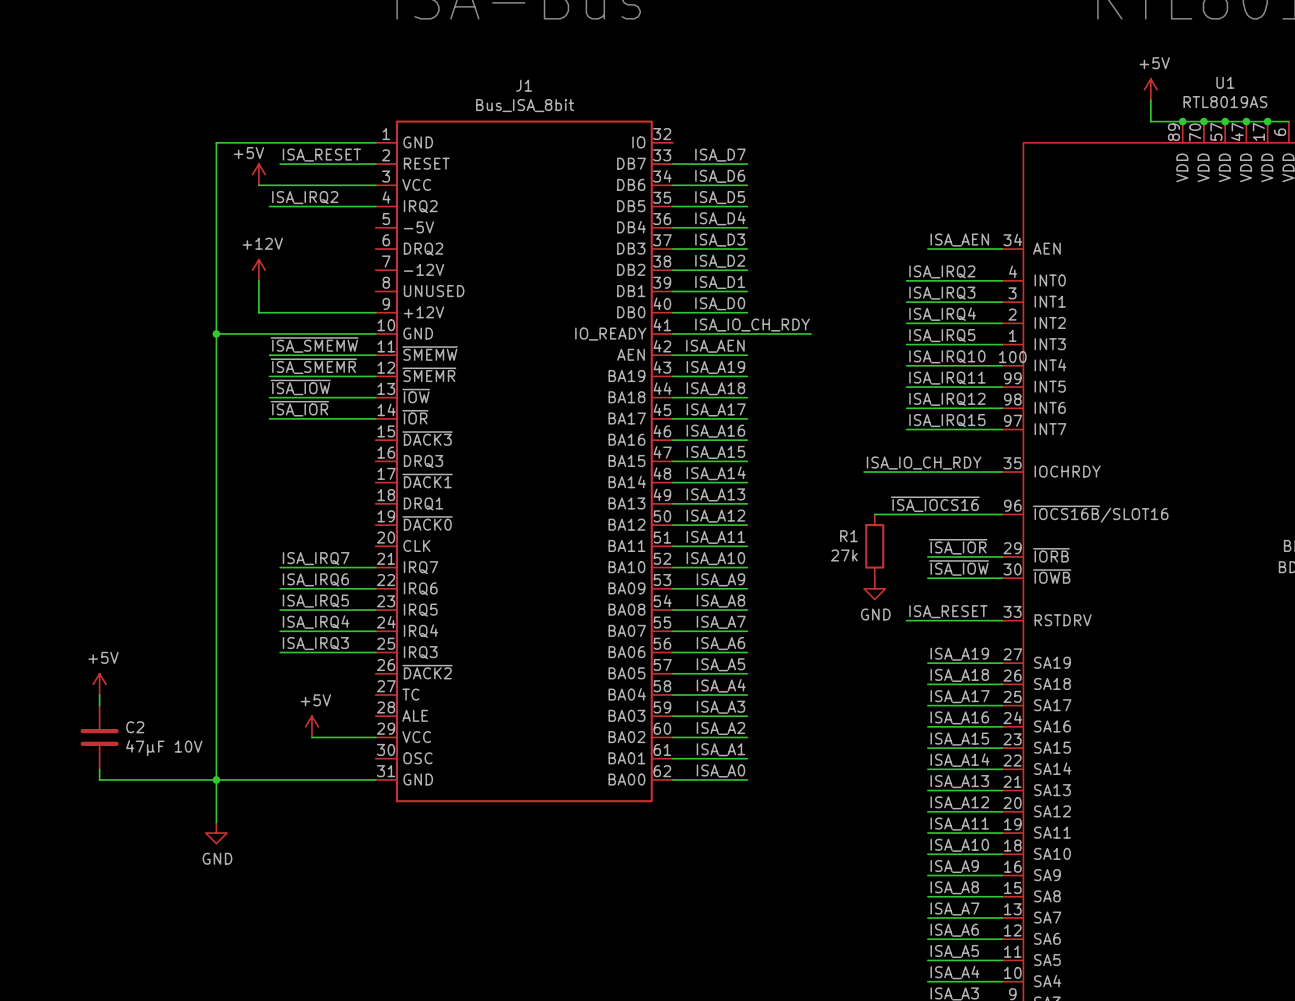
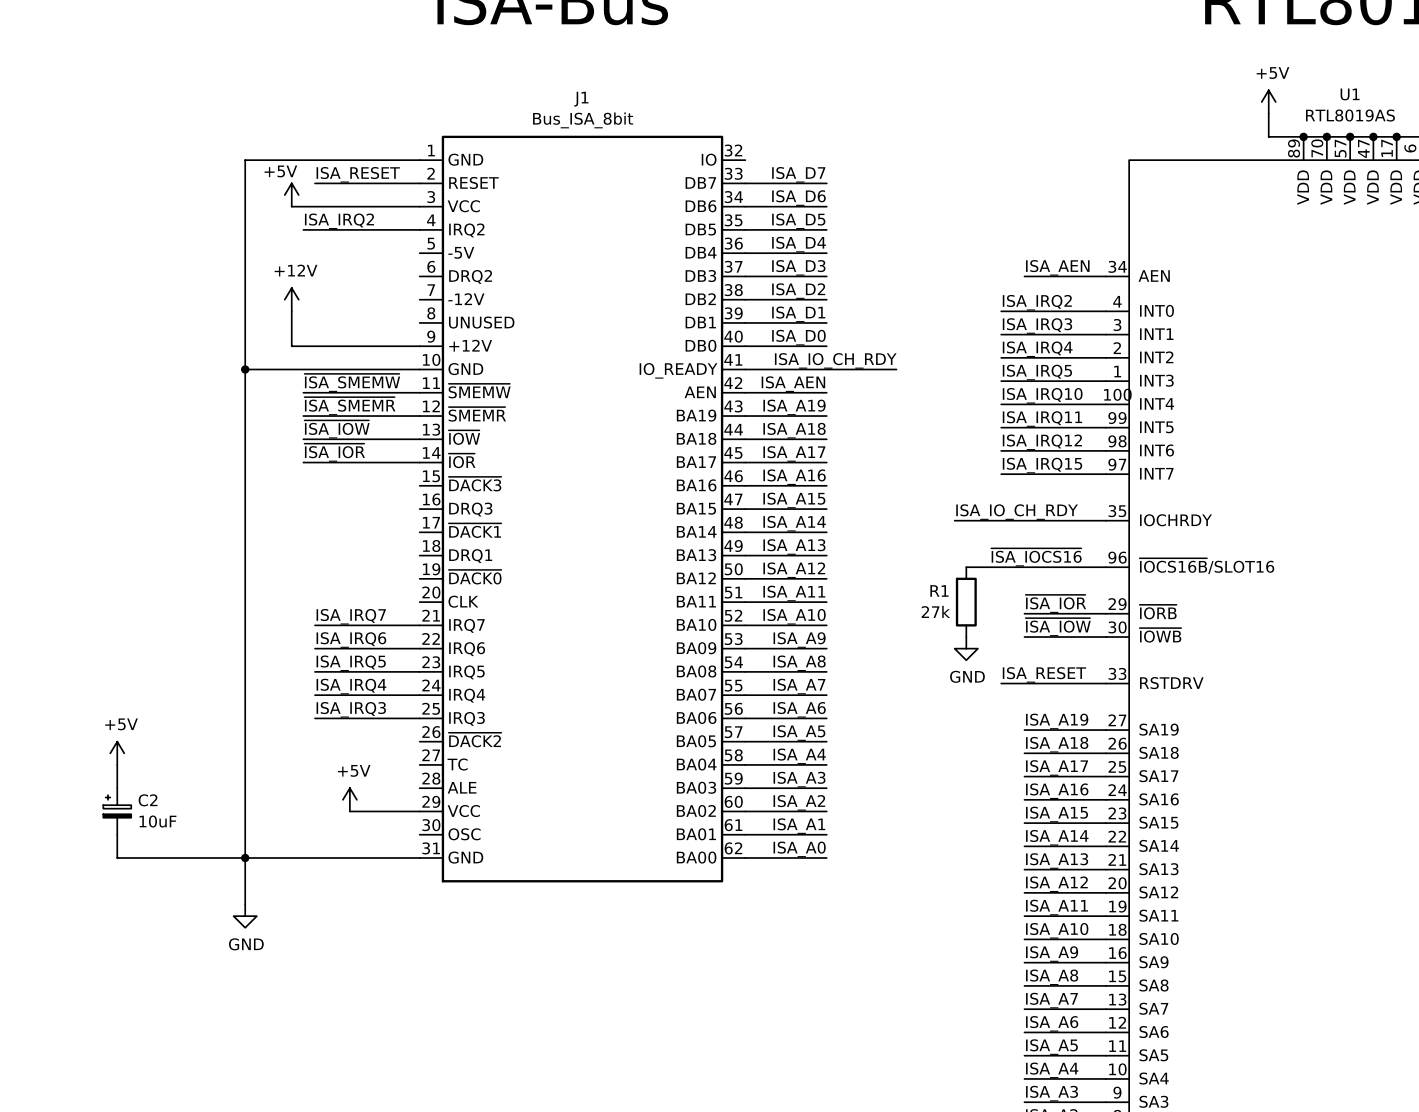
C2 symbol: [80, 705, 119, 770] -> [103, 788, 132, 835]
C2 value: 47µF 10V (164, 748) -> 10uF (157, 821)

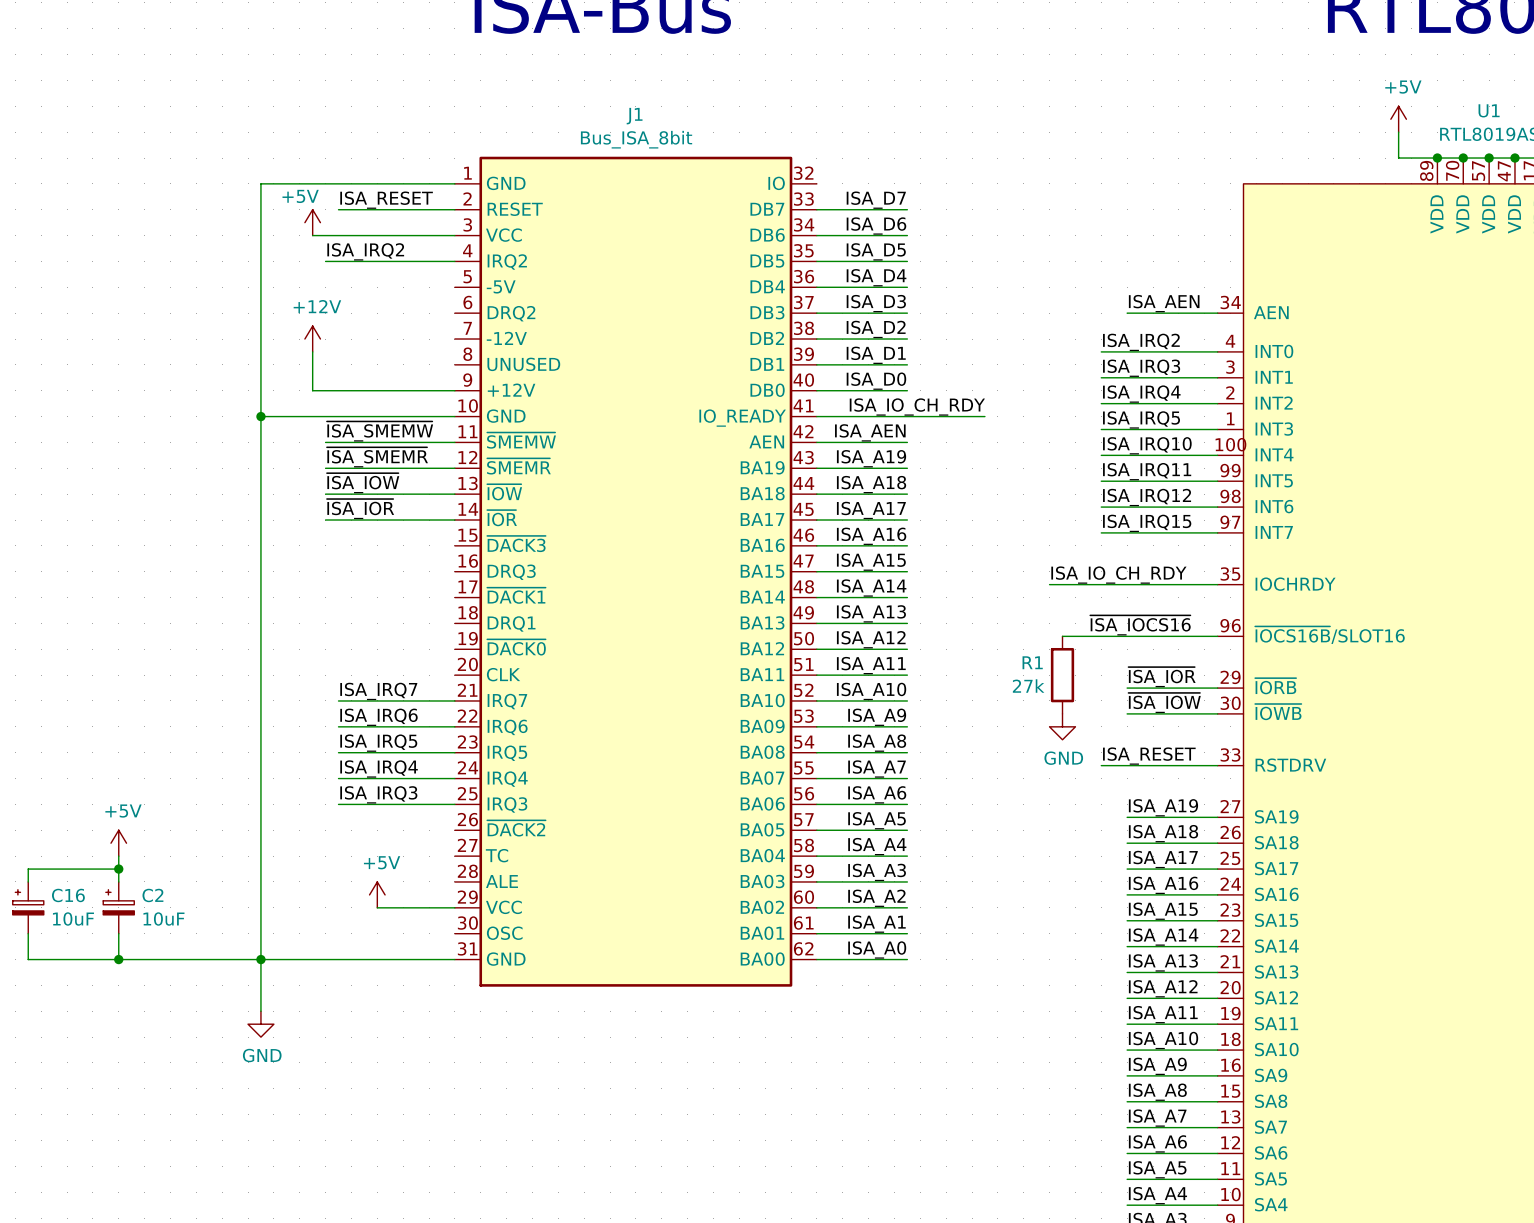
wire: none -> (118, 869) (28, 869) (28, 881)
junction: none -> (118, 869)
C16: none -> 10uF (28, 907)
wire: none -> (28, 933) (28, 959) (118, 959)
junction: none -> (118, 959)

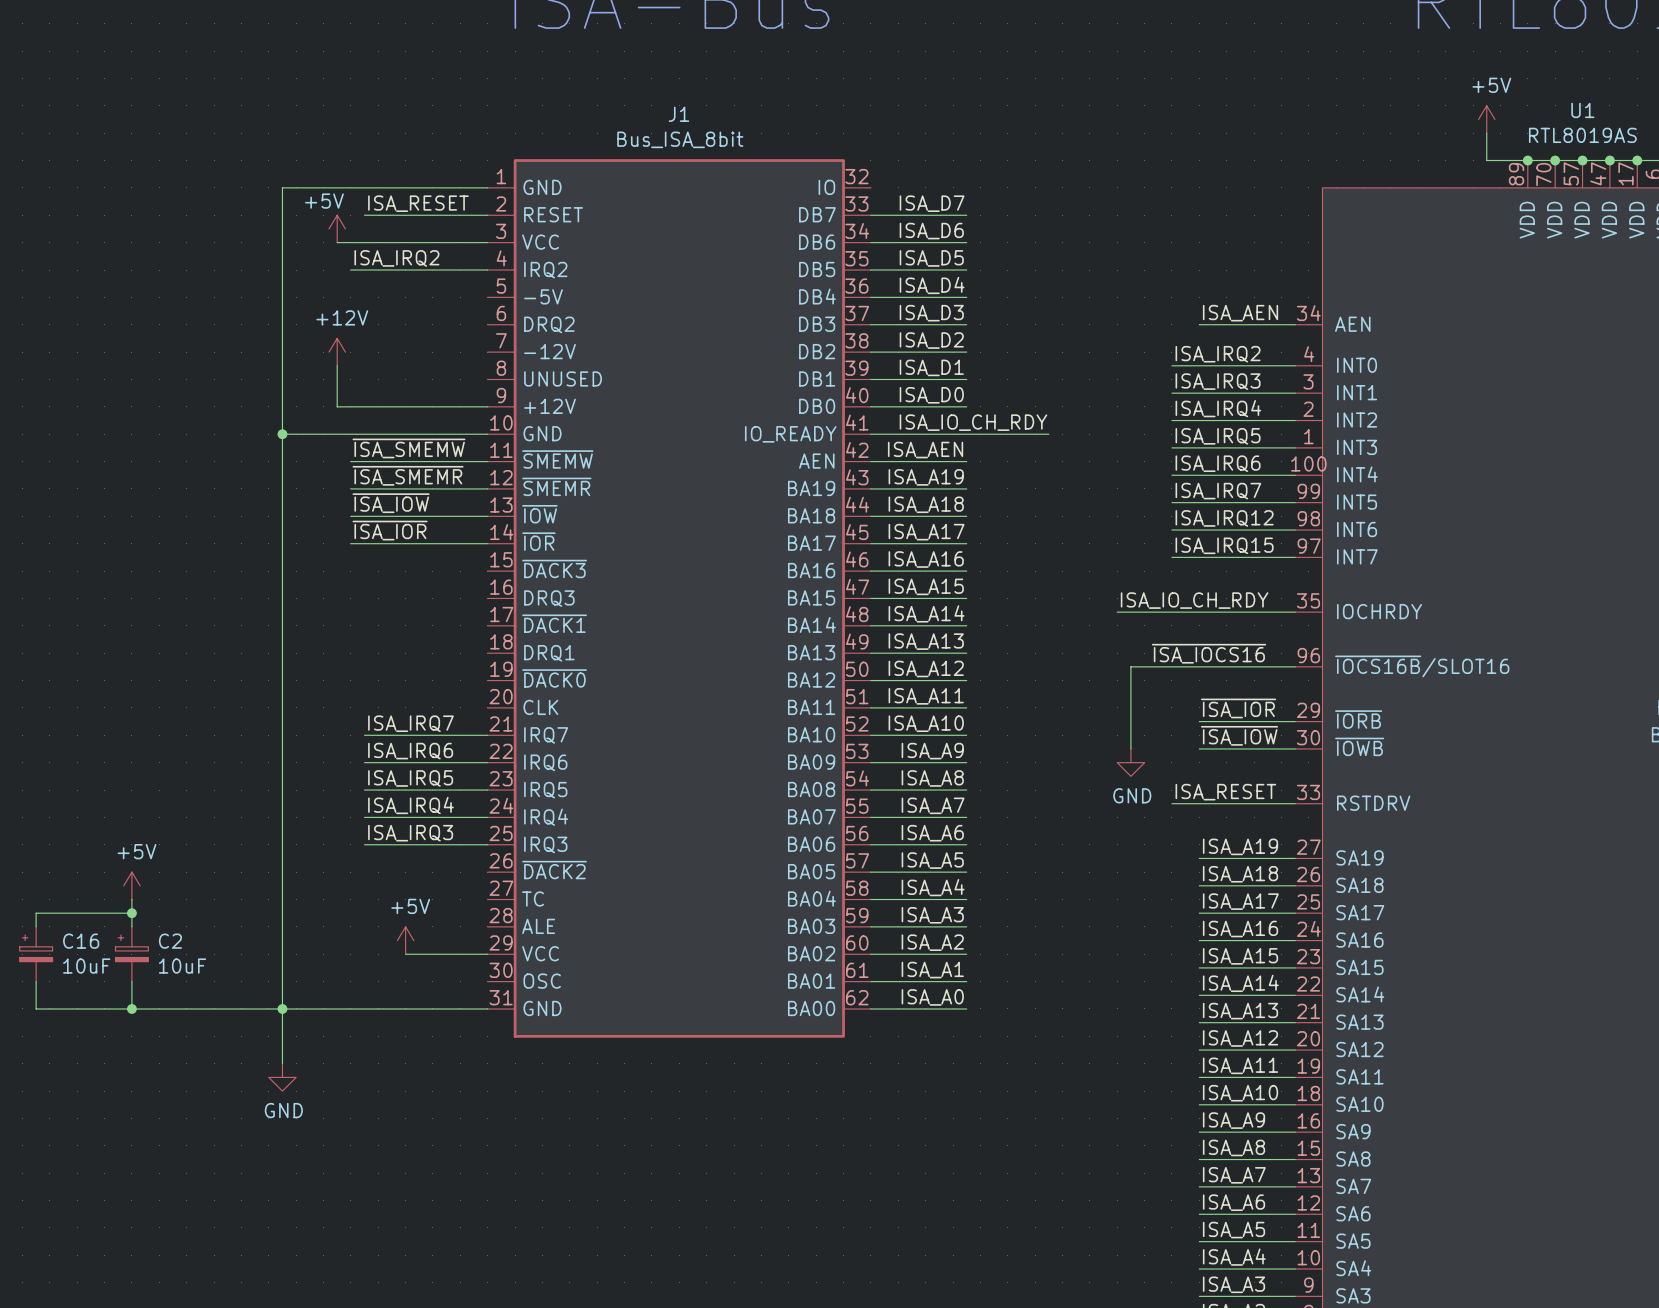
label: ISA_IRQ10 (1147, 445) -> ISA_IRQ6 (1218, 463)
label: ISA_IRQ11 (1147, 471) -> ISA_IRQ7 (1218, 491)
wire: none -> (1130, 666) (1130, 748)
R1: 27k (1062, 675) -> none

